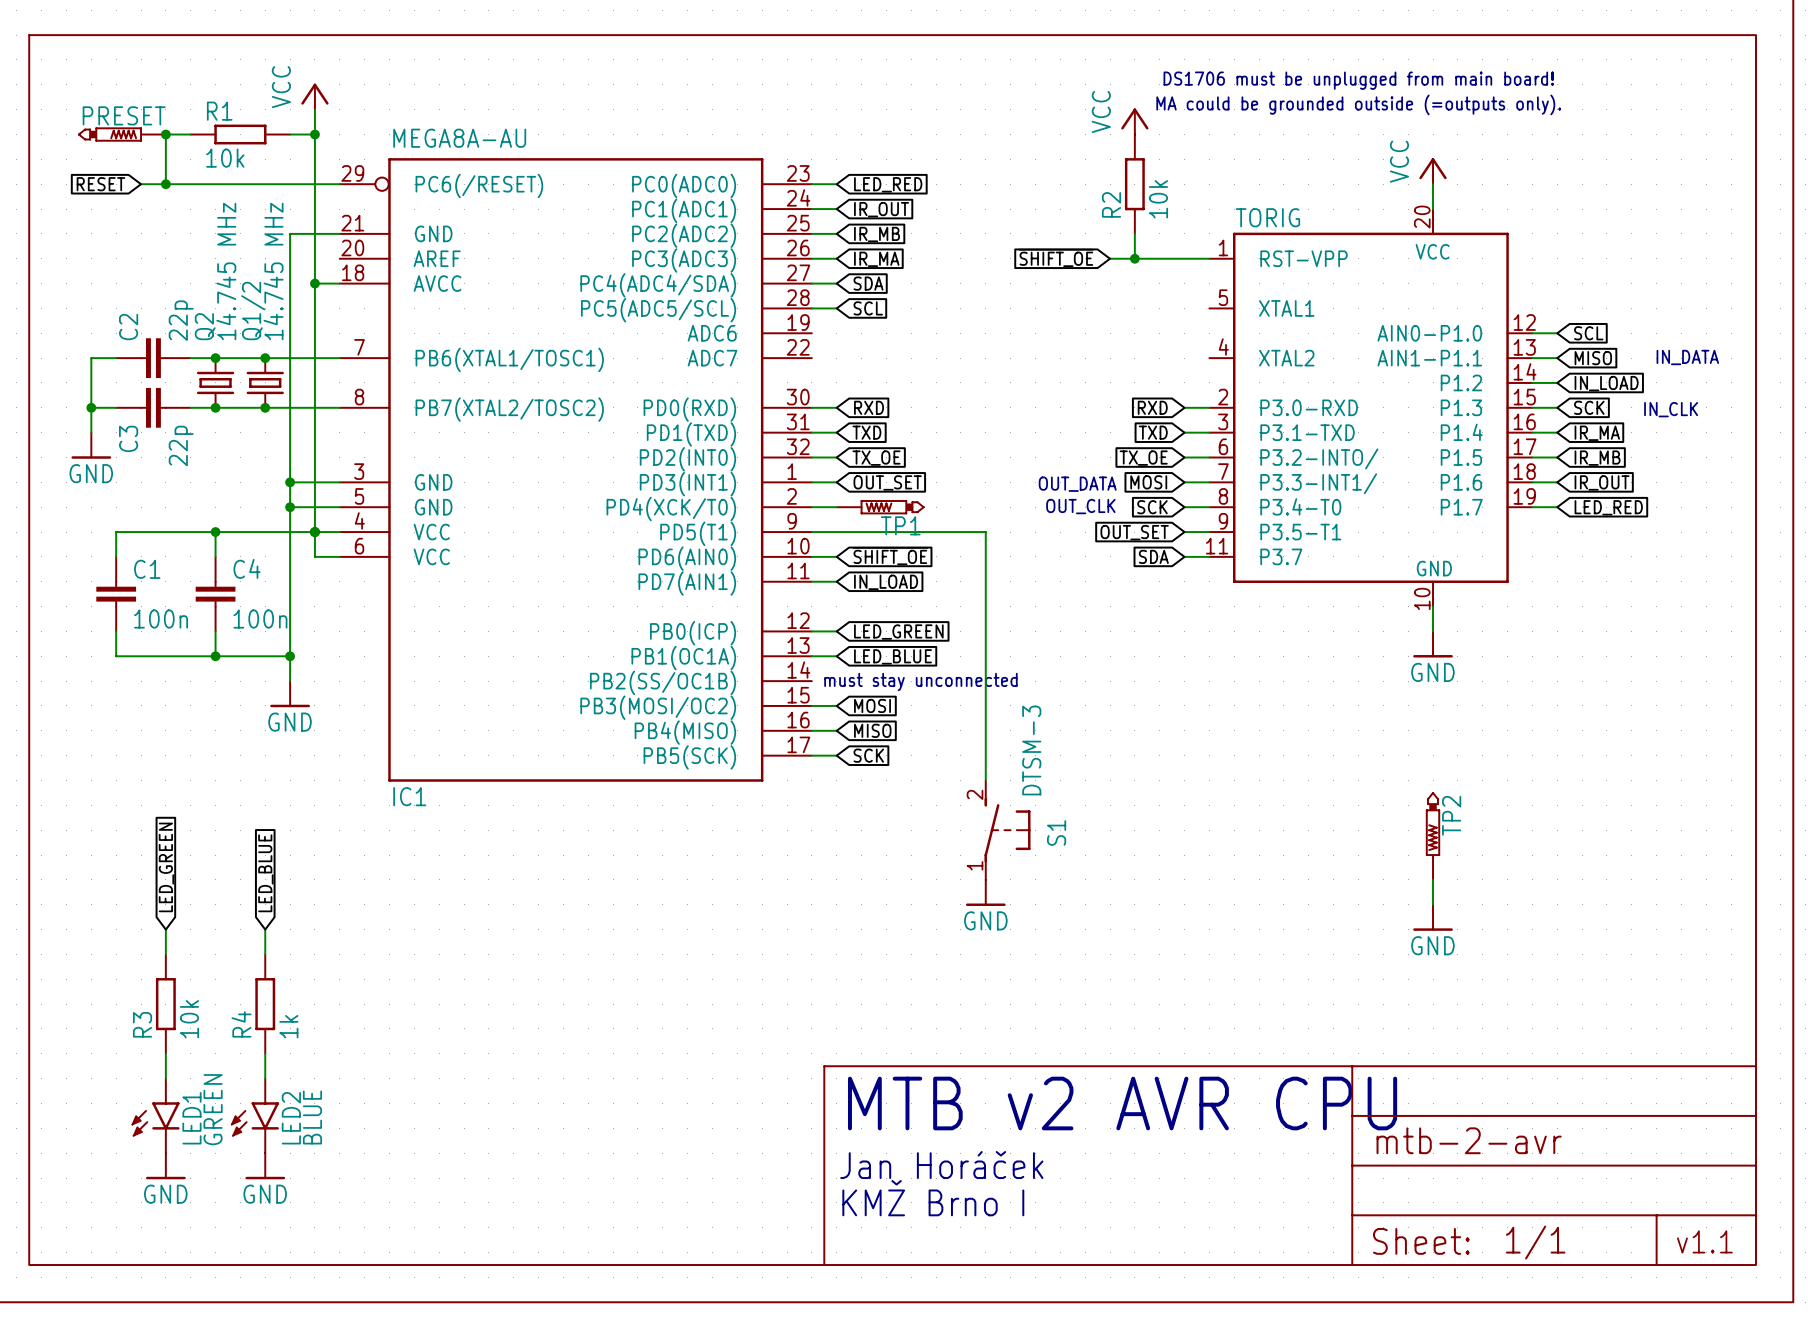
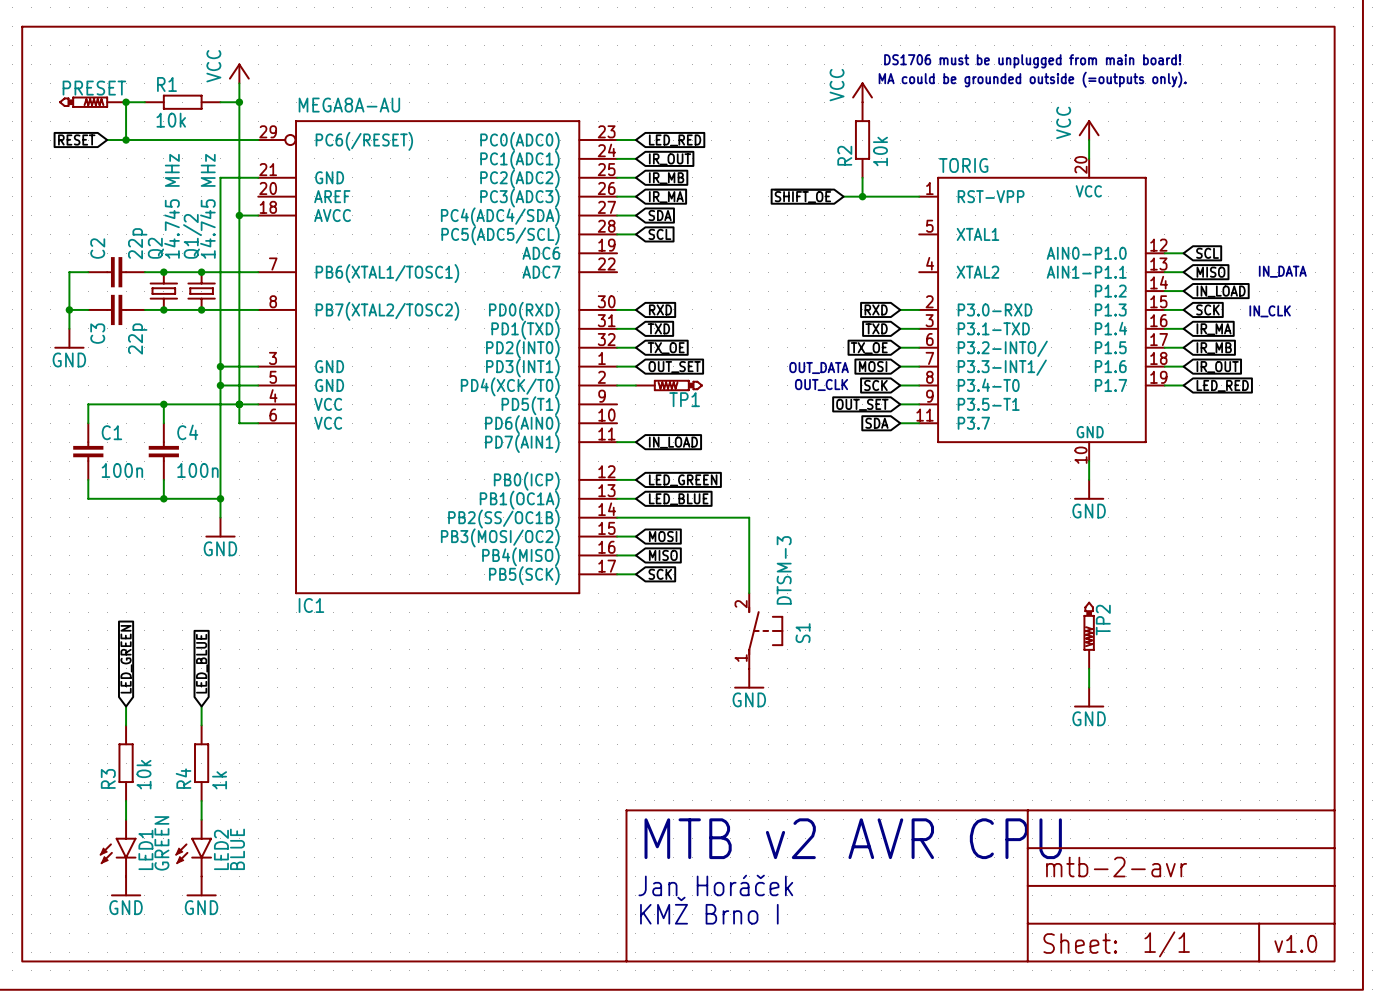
wire: (811, 532) (985, 532) (985, 681) -> (617, 517) (749, 517)
wire: (811, 556) (836, 556) -> none
global label: ~{SHIFT_OE} (890, 556) -> none
text: must stay unconnected (920, 681) -> none
text: v1.1 (1704, 1241) -> v1.0 (1295, 943)

